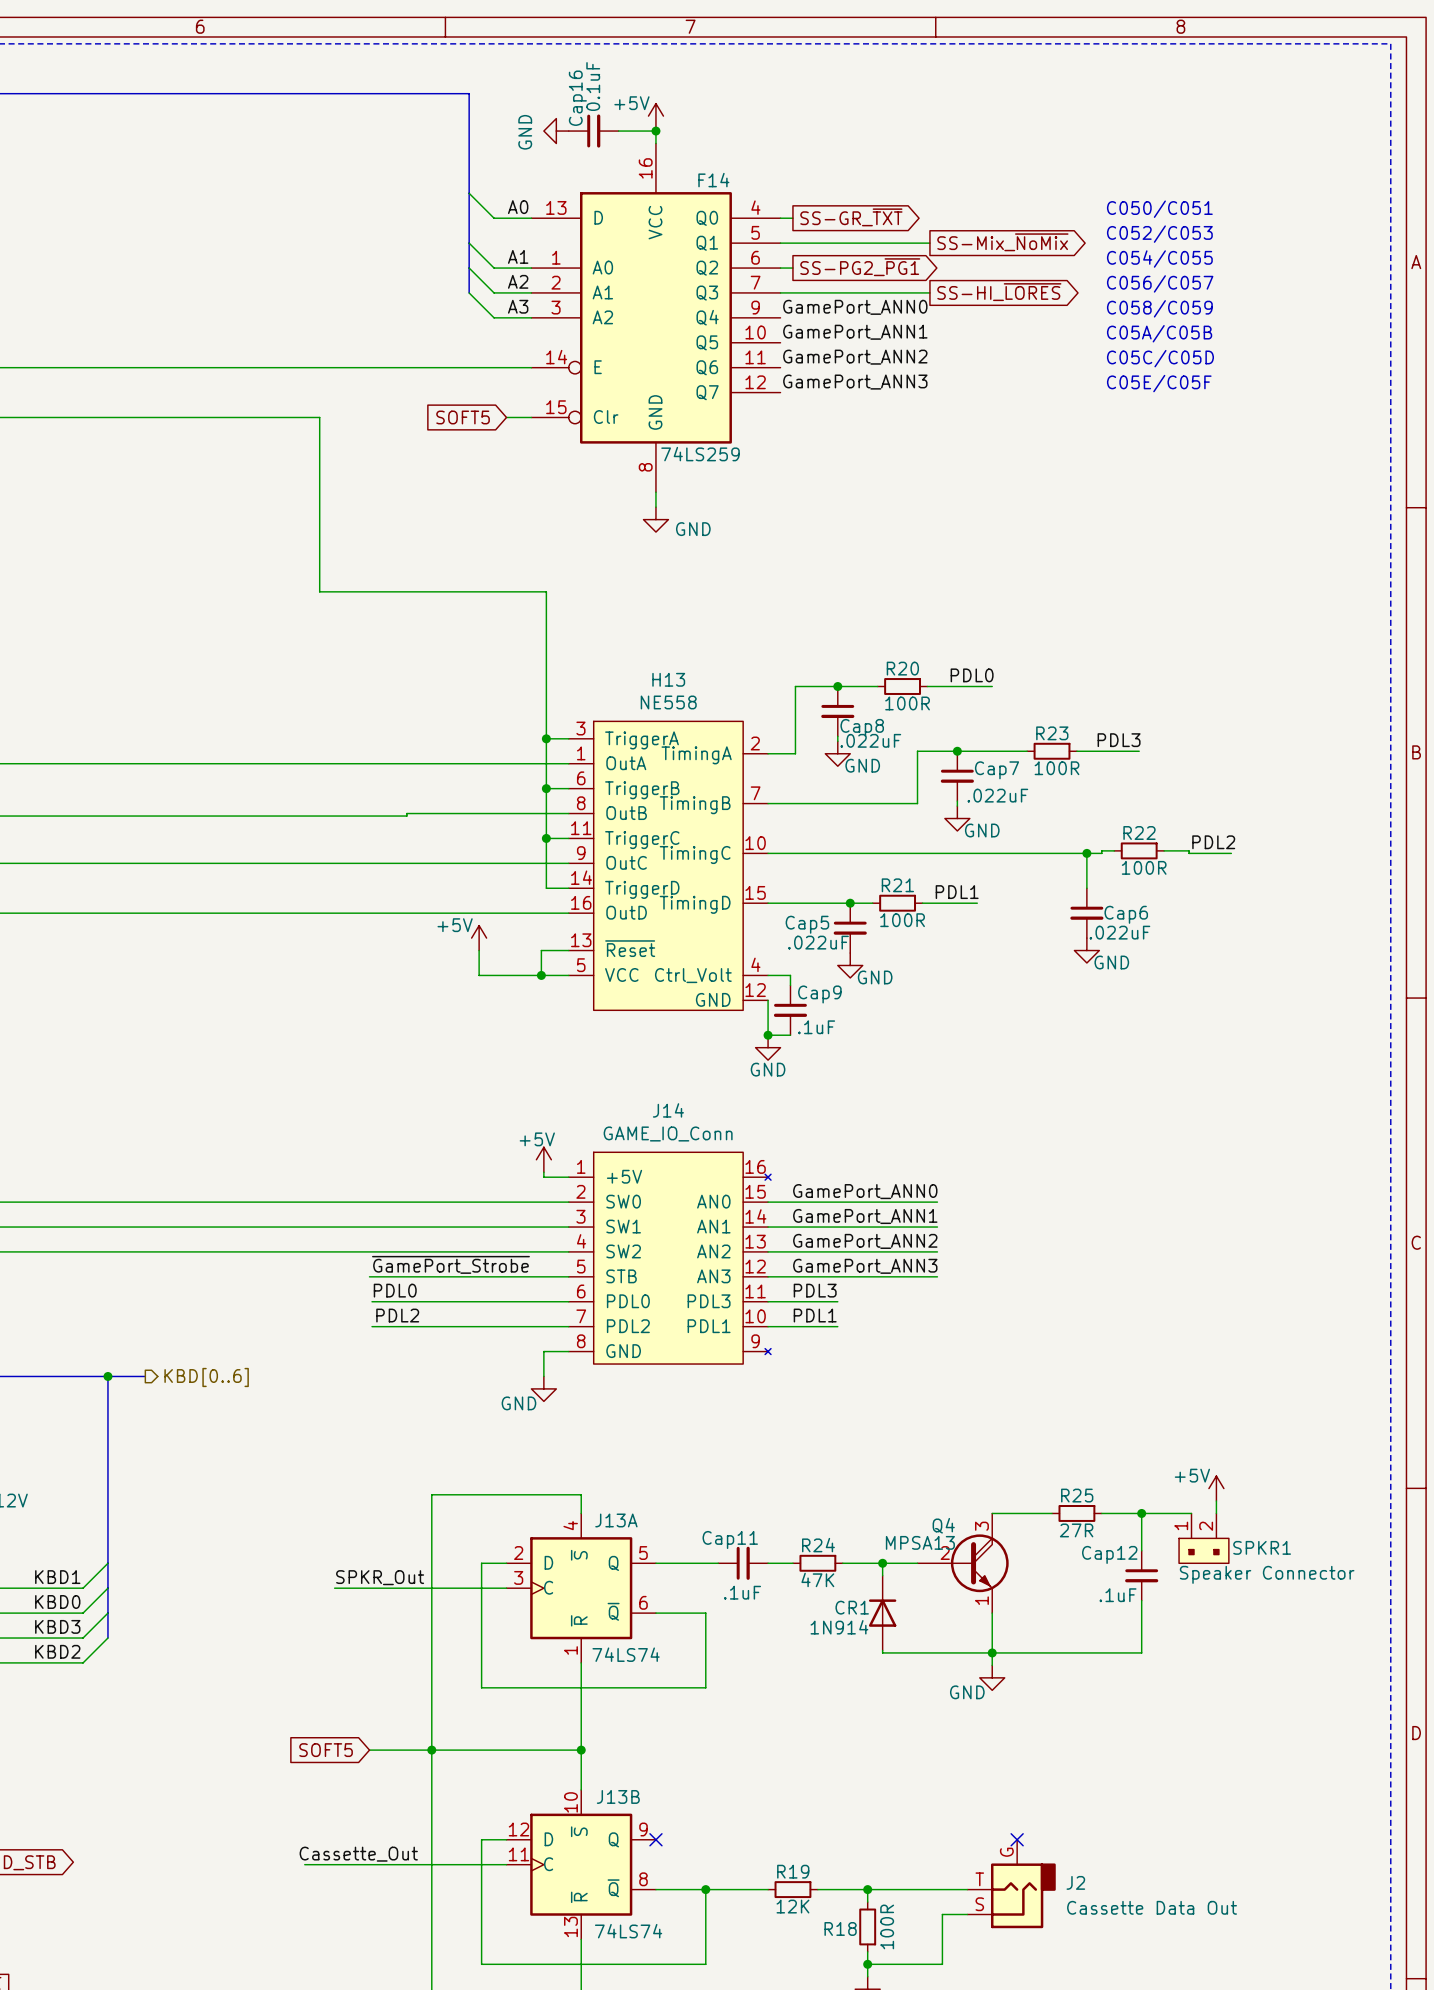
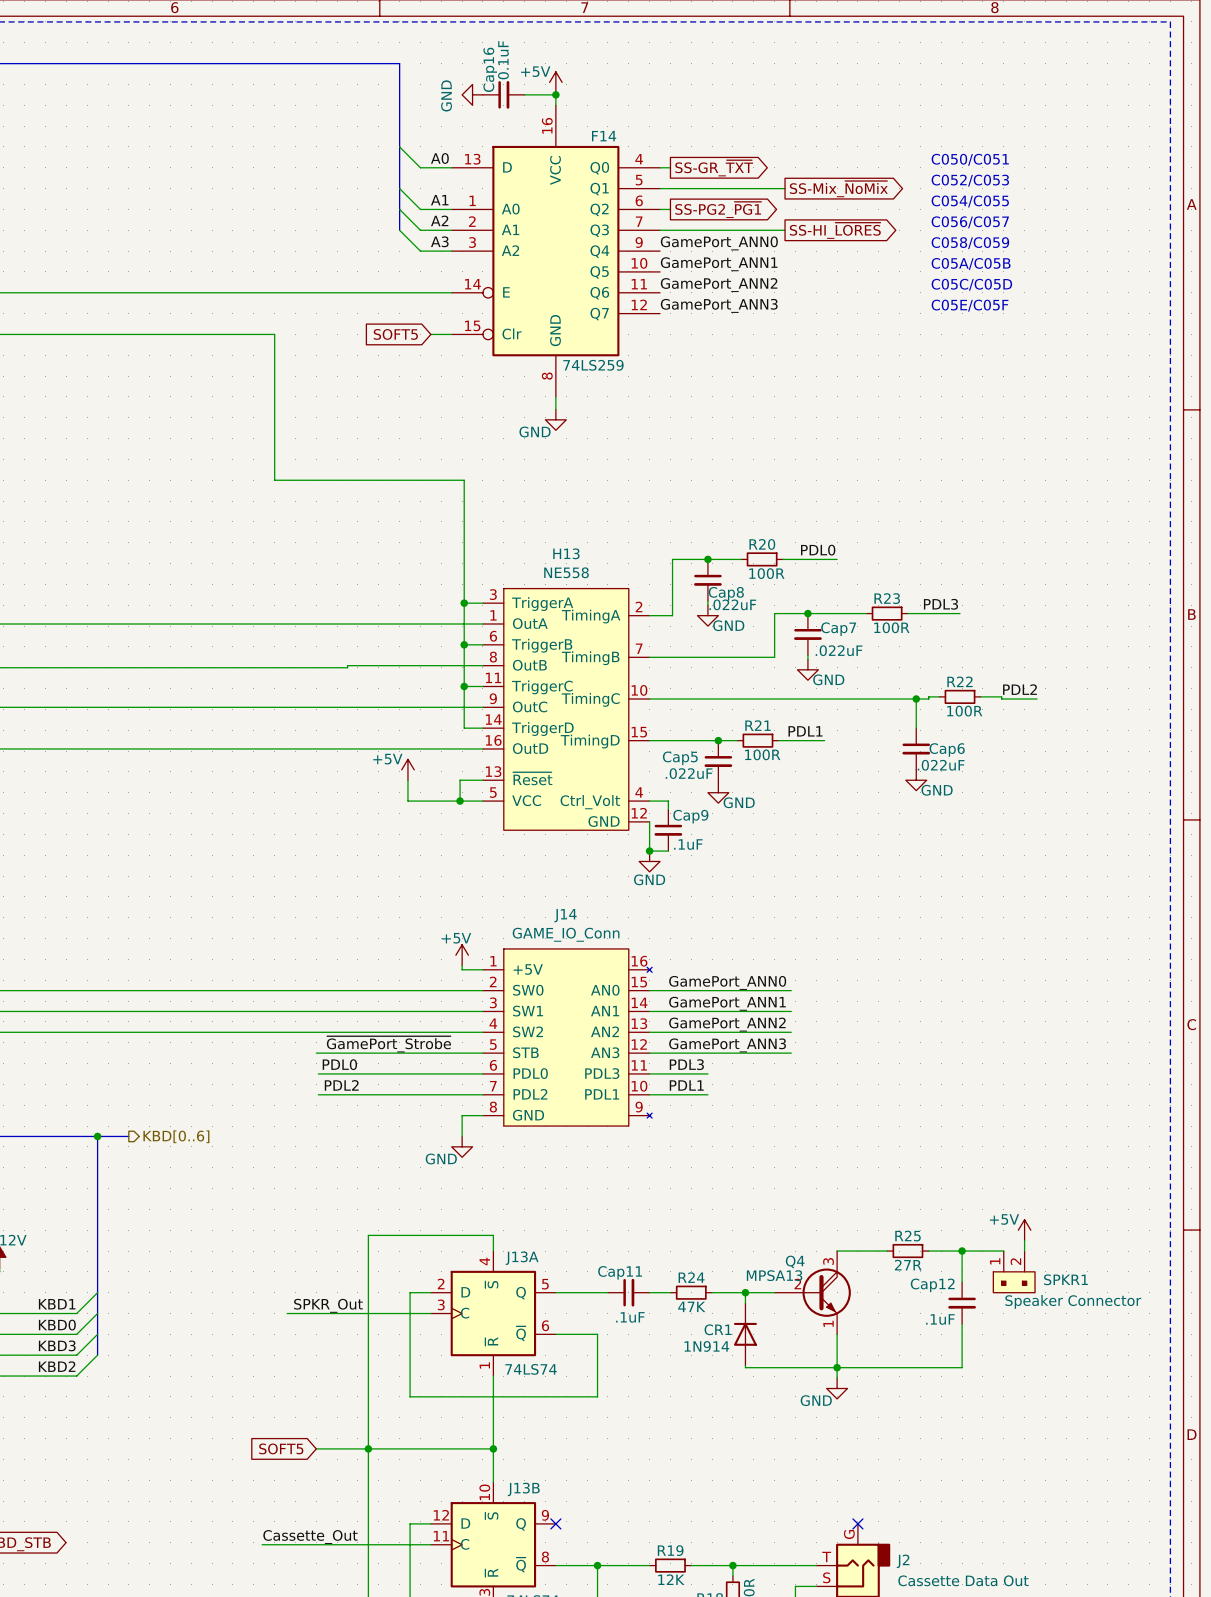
power symbol text position: GND (693, 529) -> GND (535, 431)

